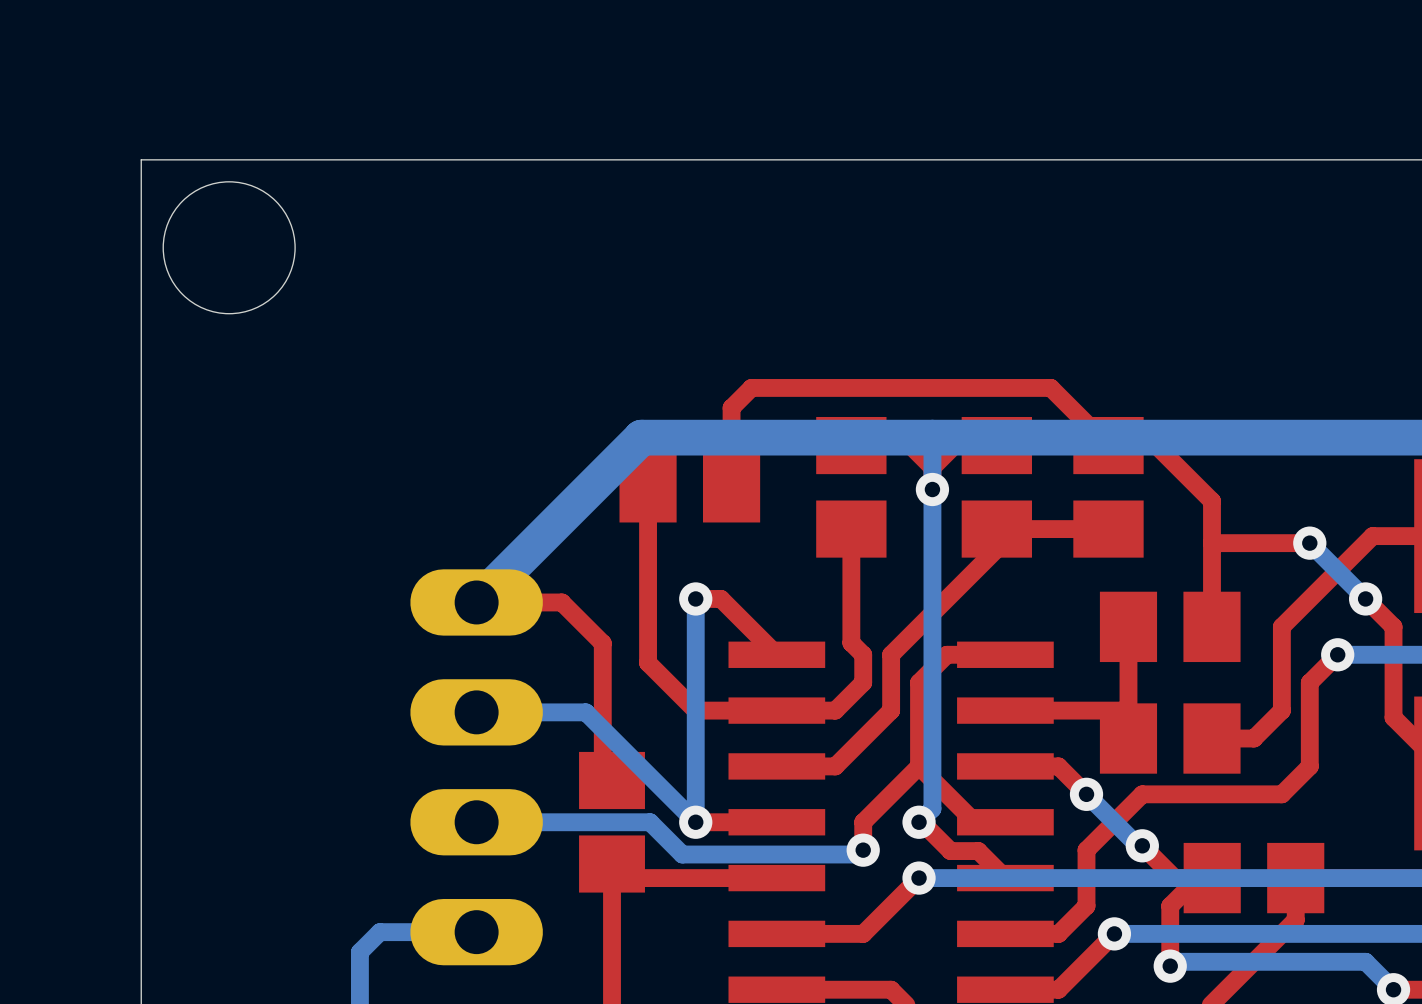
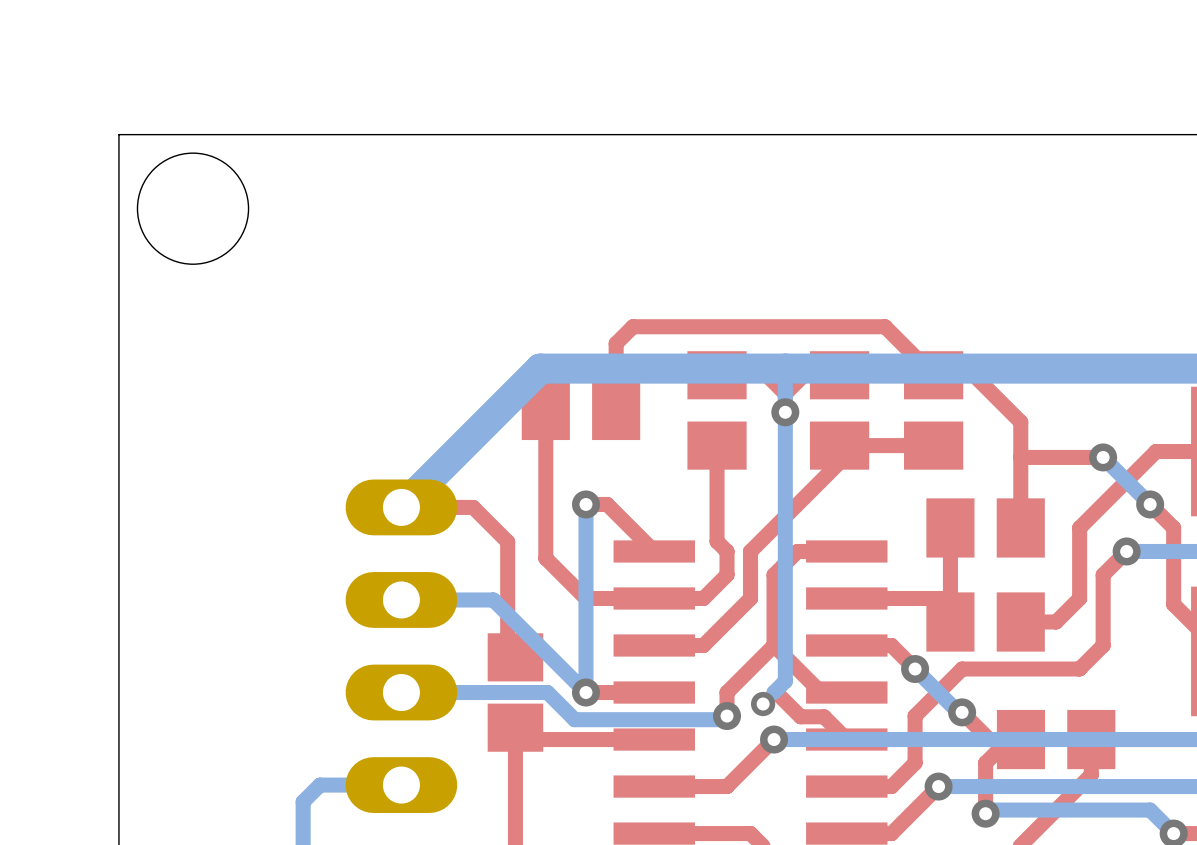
via position: (919, 822) -> (763, 704)

